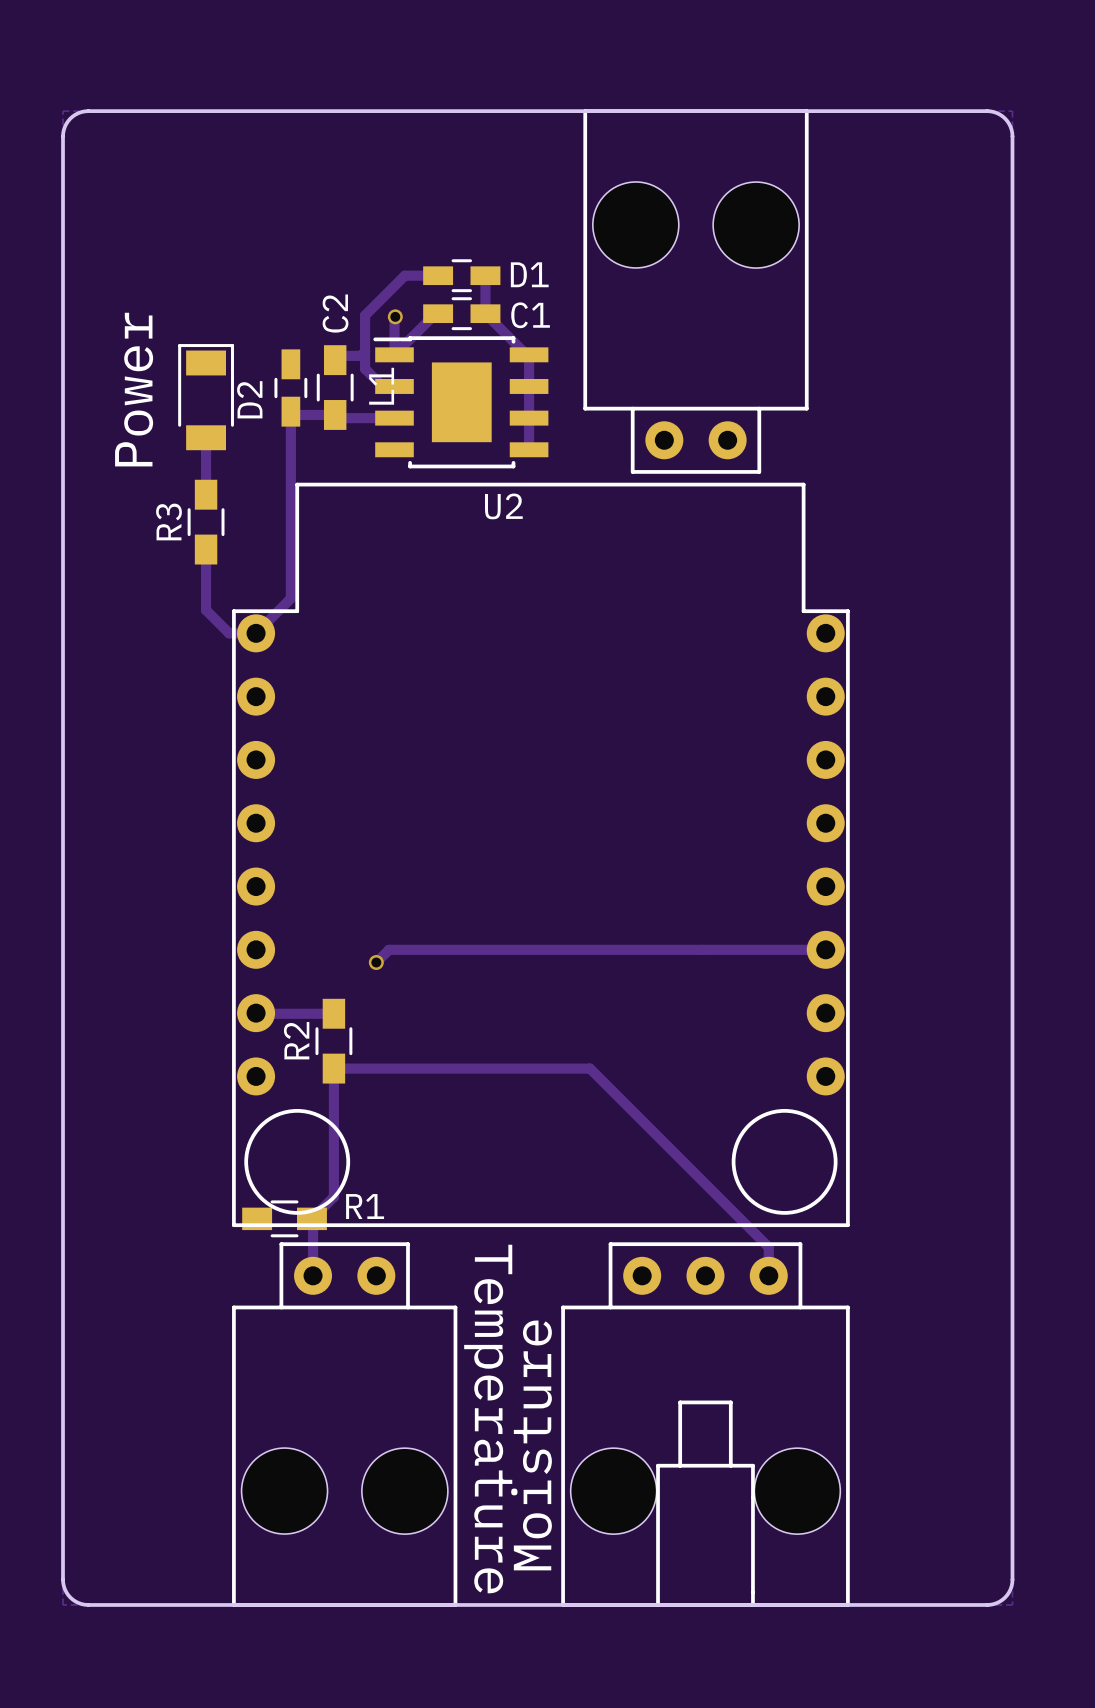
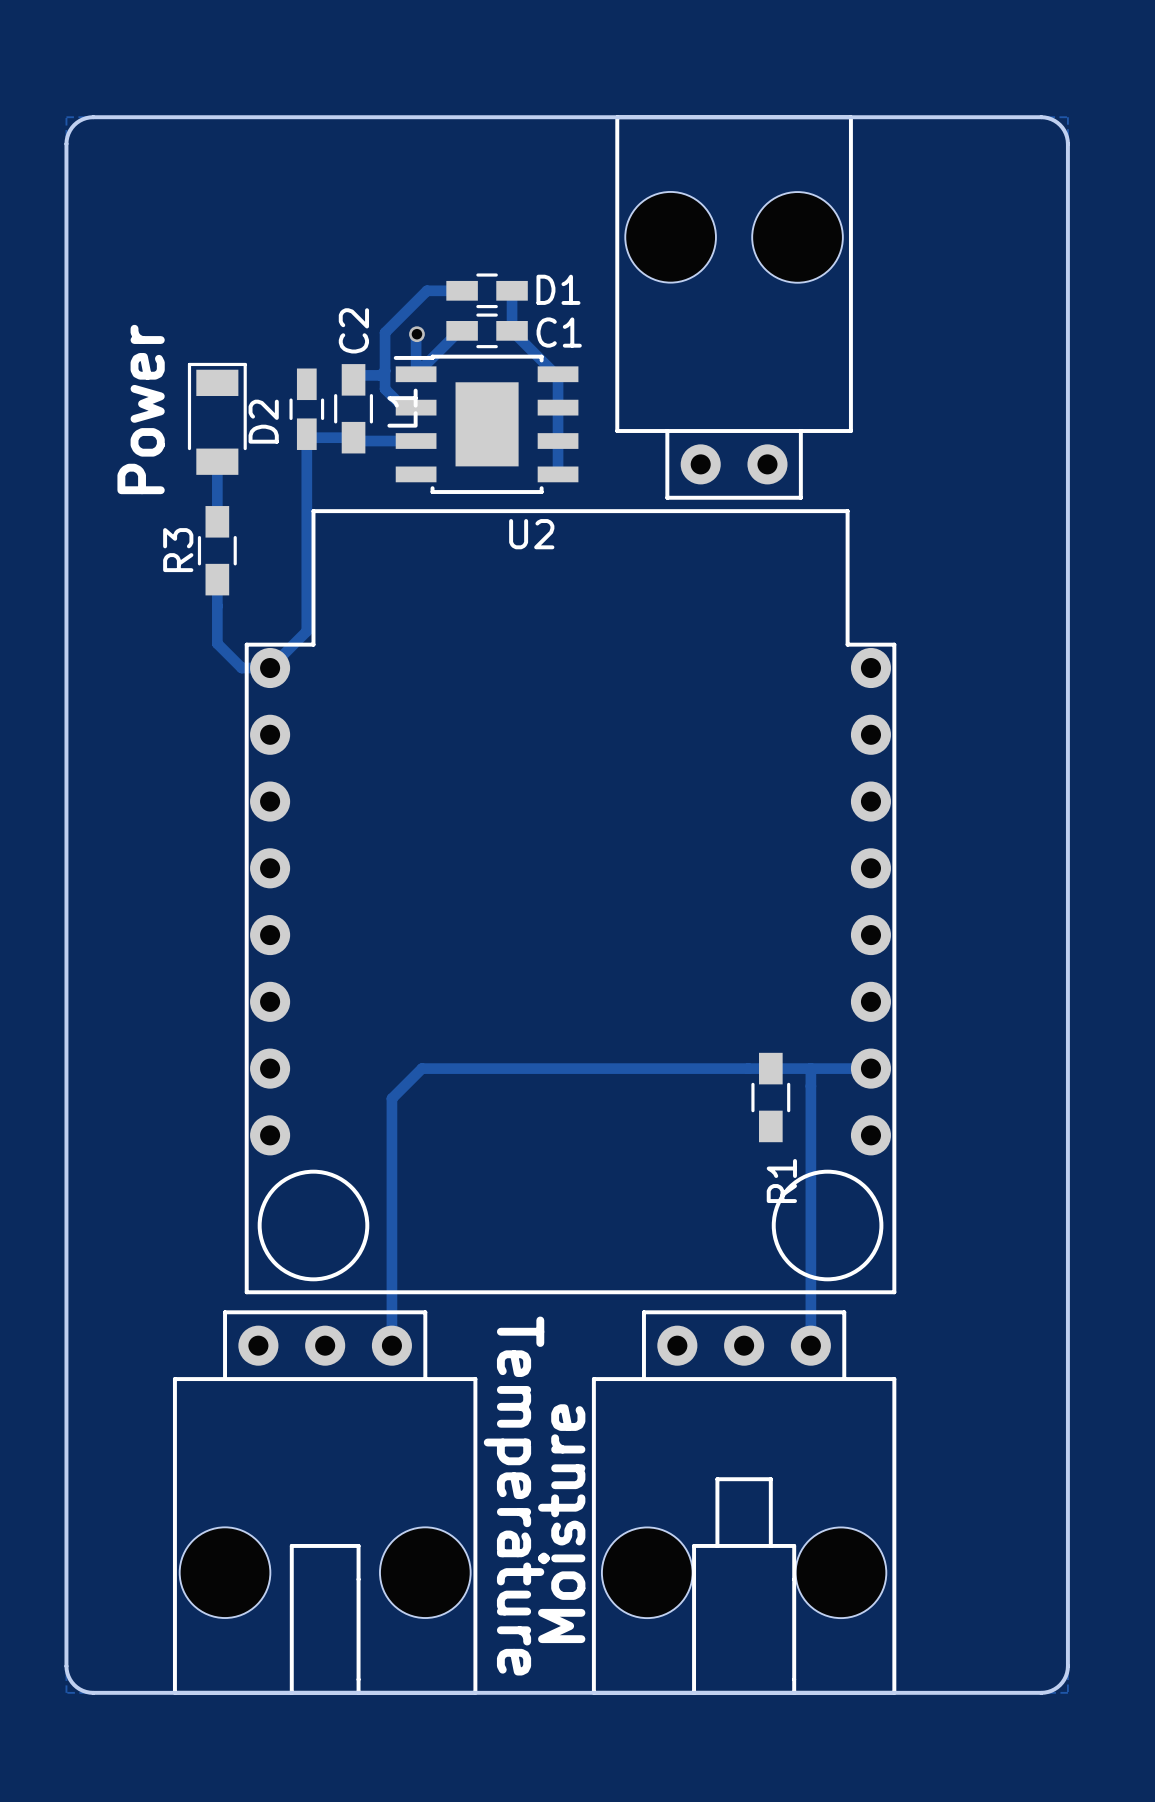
track: (825, 949) (388, 949) (376, 962) -> none
via: (376, 962) -> none
track: (256, 1013) (333, 1013) -> none
track: none -> (870, 1068) (421, 1068) (391, 1098) (391, 1345)
R2: (333, 1041) -> none
R1 rotation: 0° (284, 1218) -> 90° clockwise (770, 1097)
R1 position: (284, 1218) -> (770, 1097)
track: (768, 1247) (590, 1068) (333, 1068) (333, 1196) (311, 1218) (313, 1275) -> (810, 1315) (810, 1068)
part: none -> (325, 1502)
part: (344, 1424) -> none

